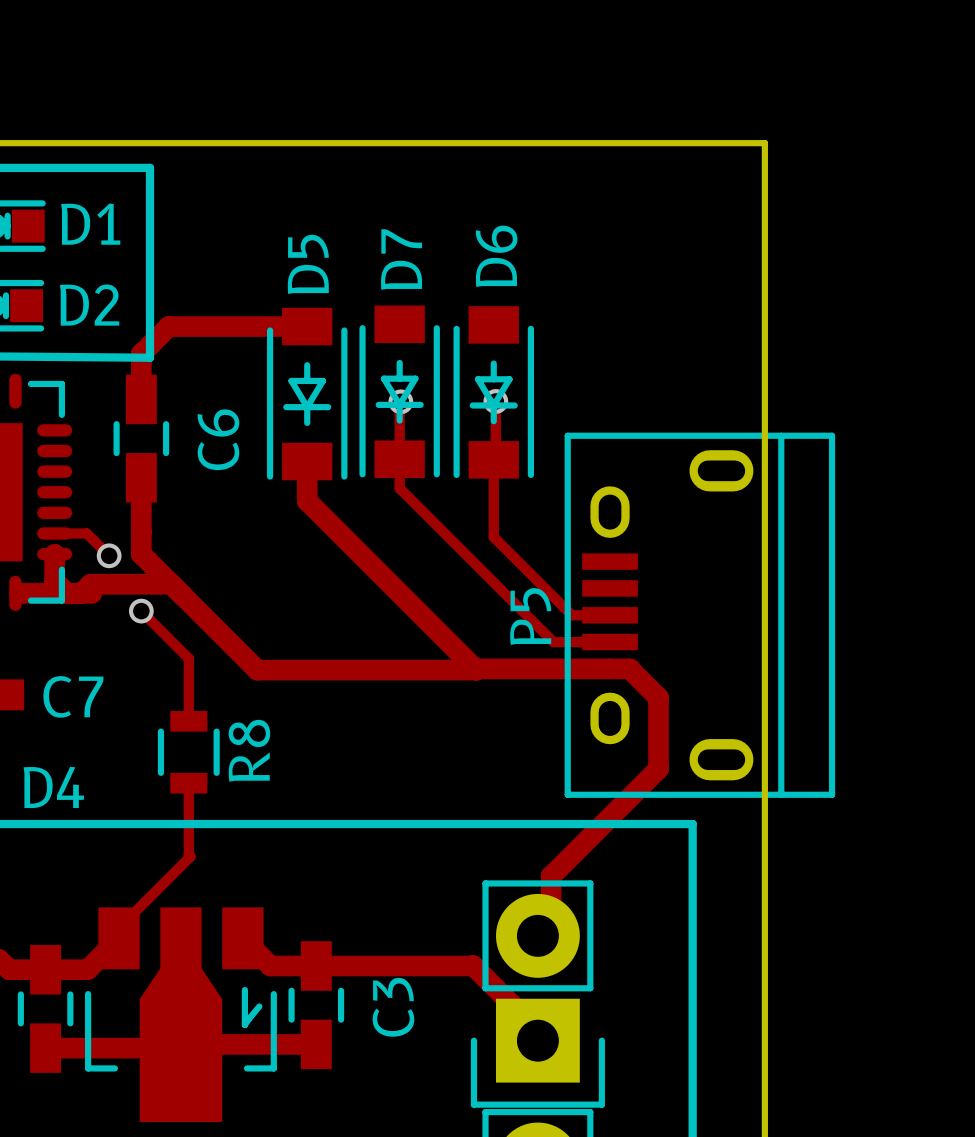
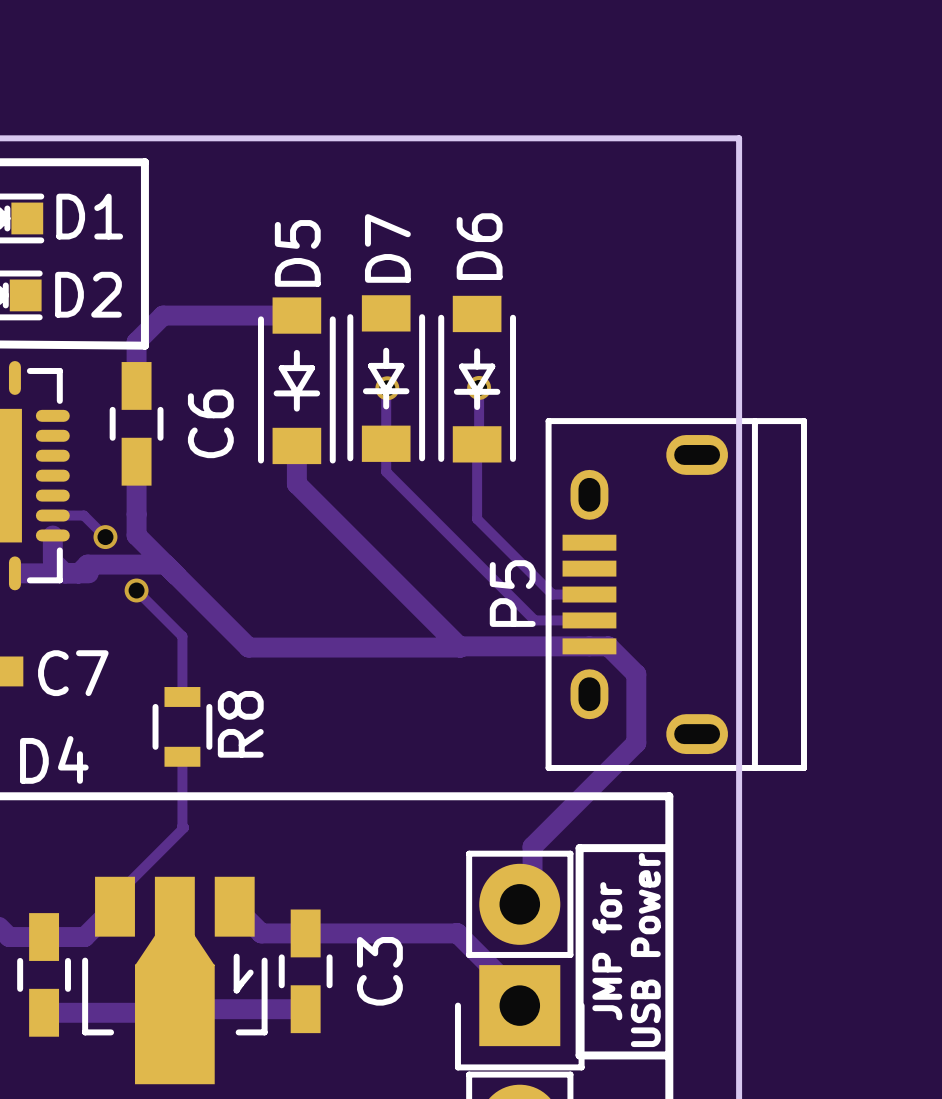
line: none -> (667, 848) (579, 848) (579, 1055) (667, 1055)
text: none -> USB Power (645, 950)
text: none -> JMP for (607, 951)

